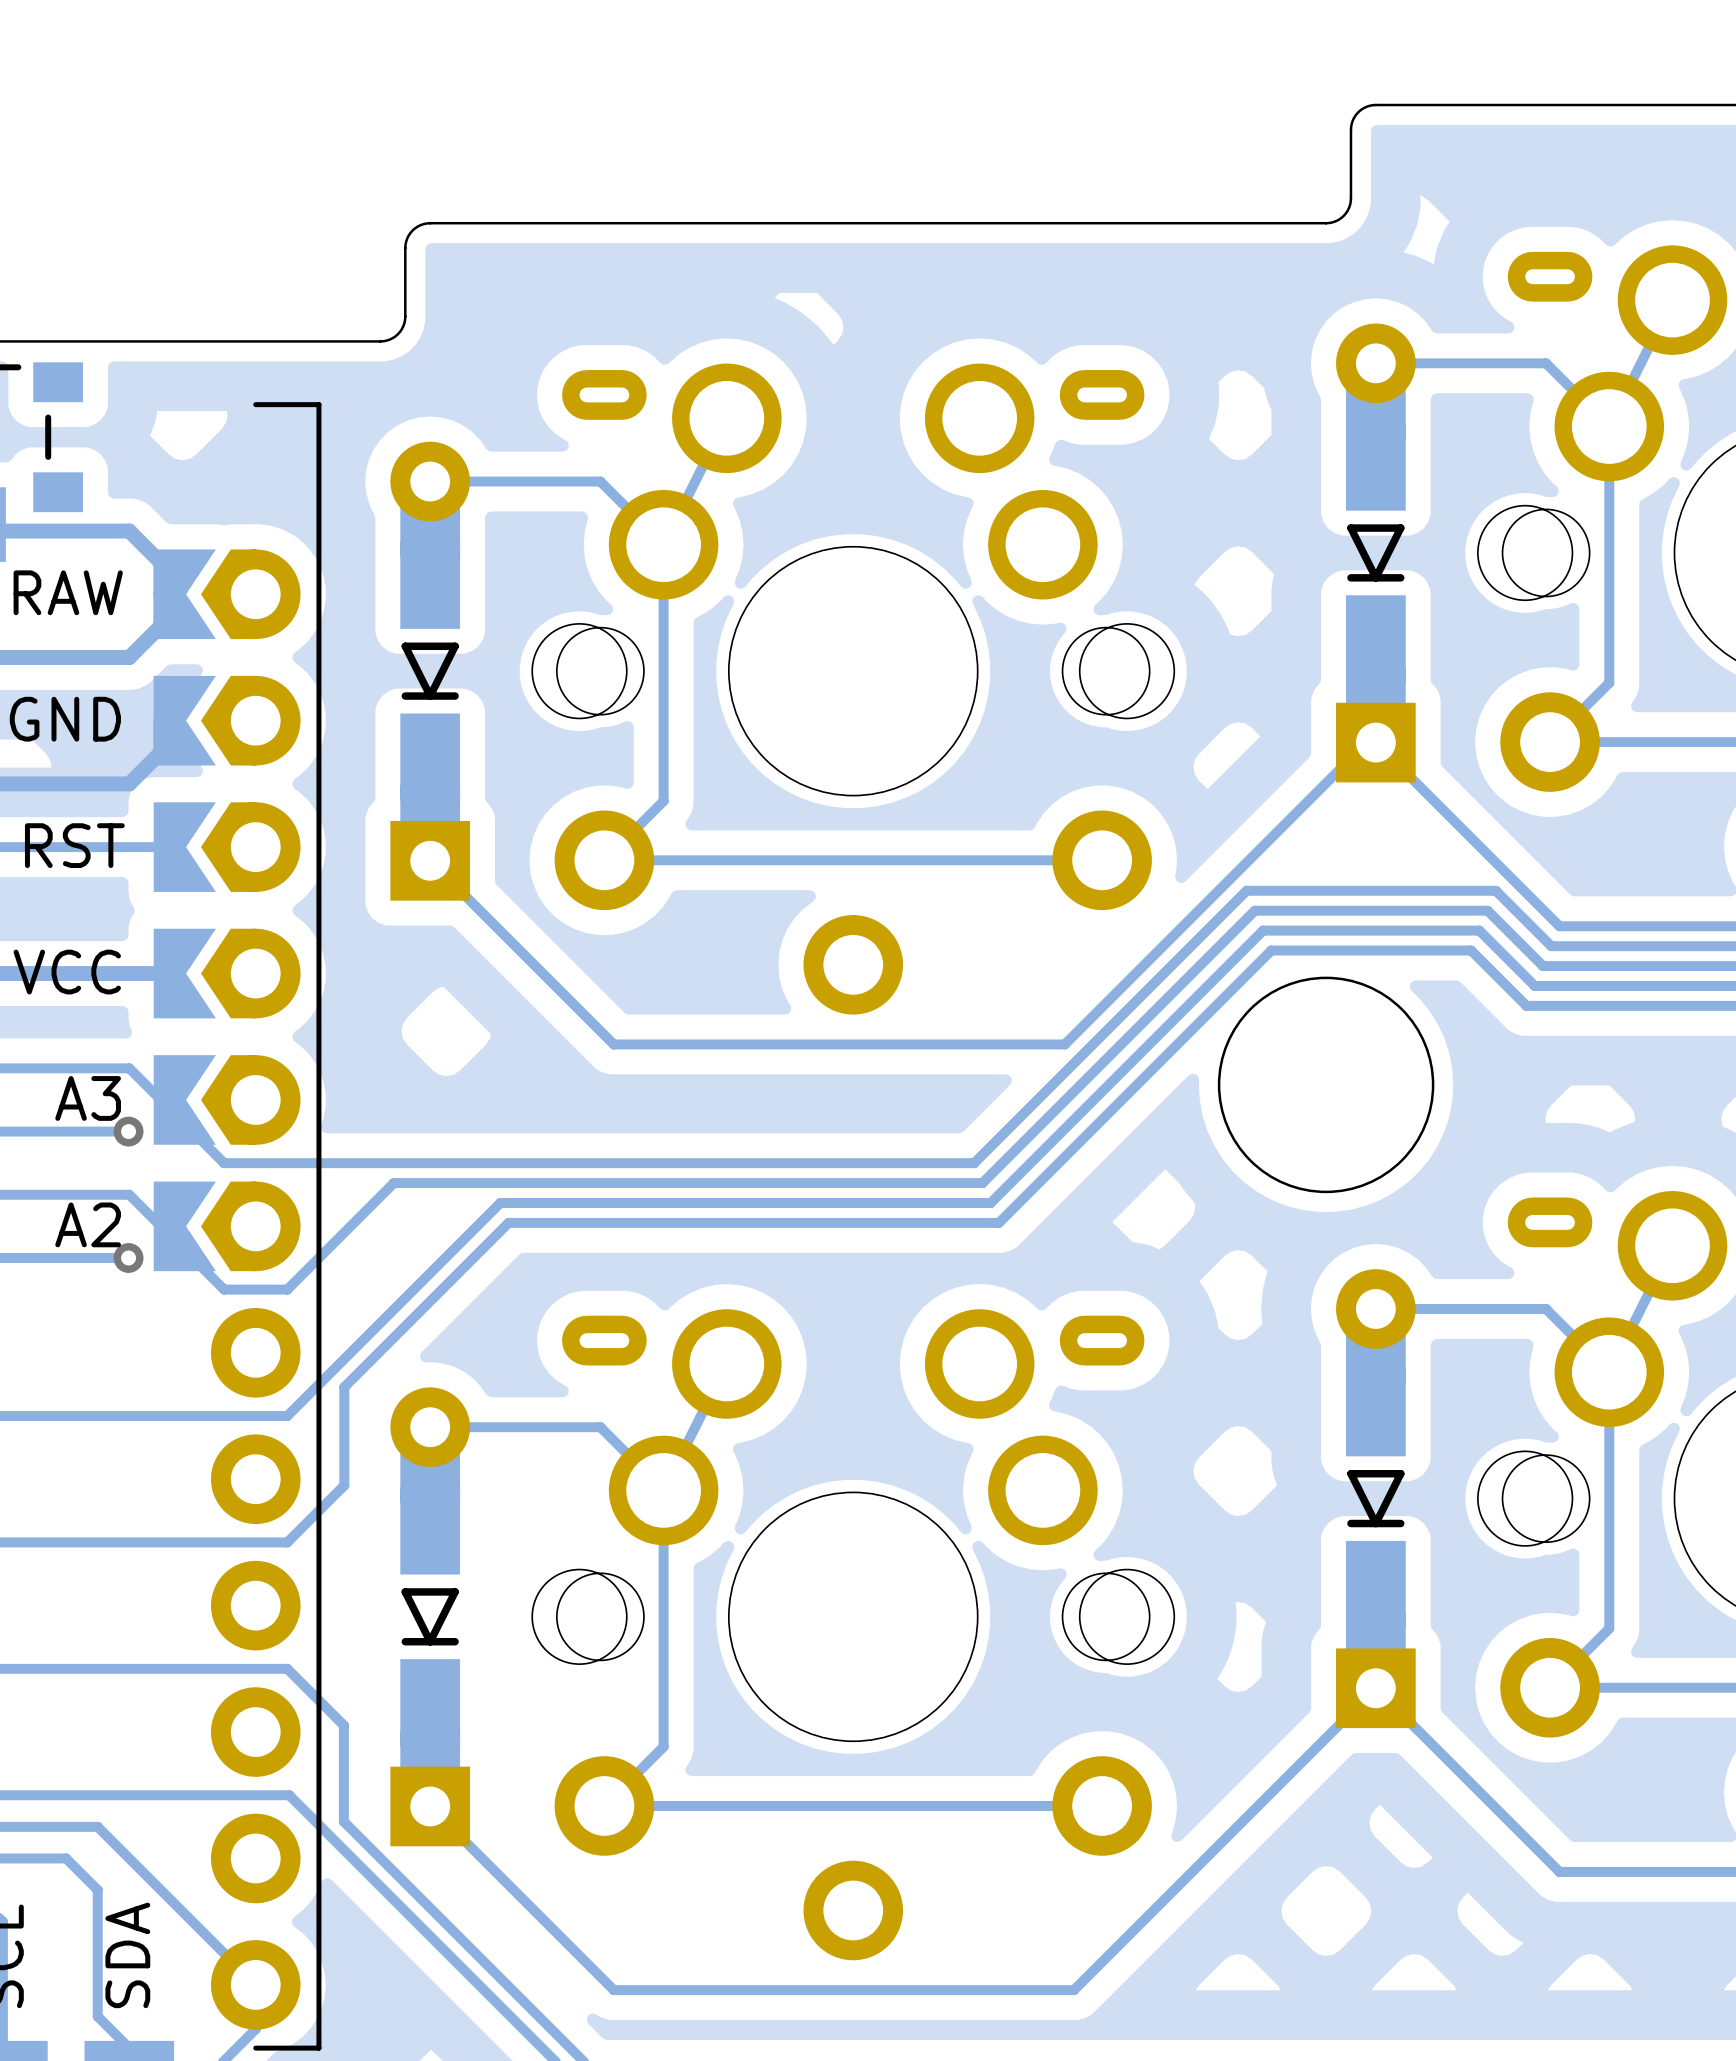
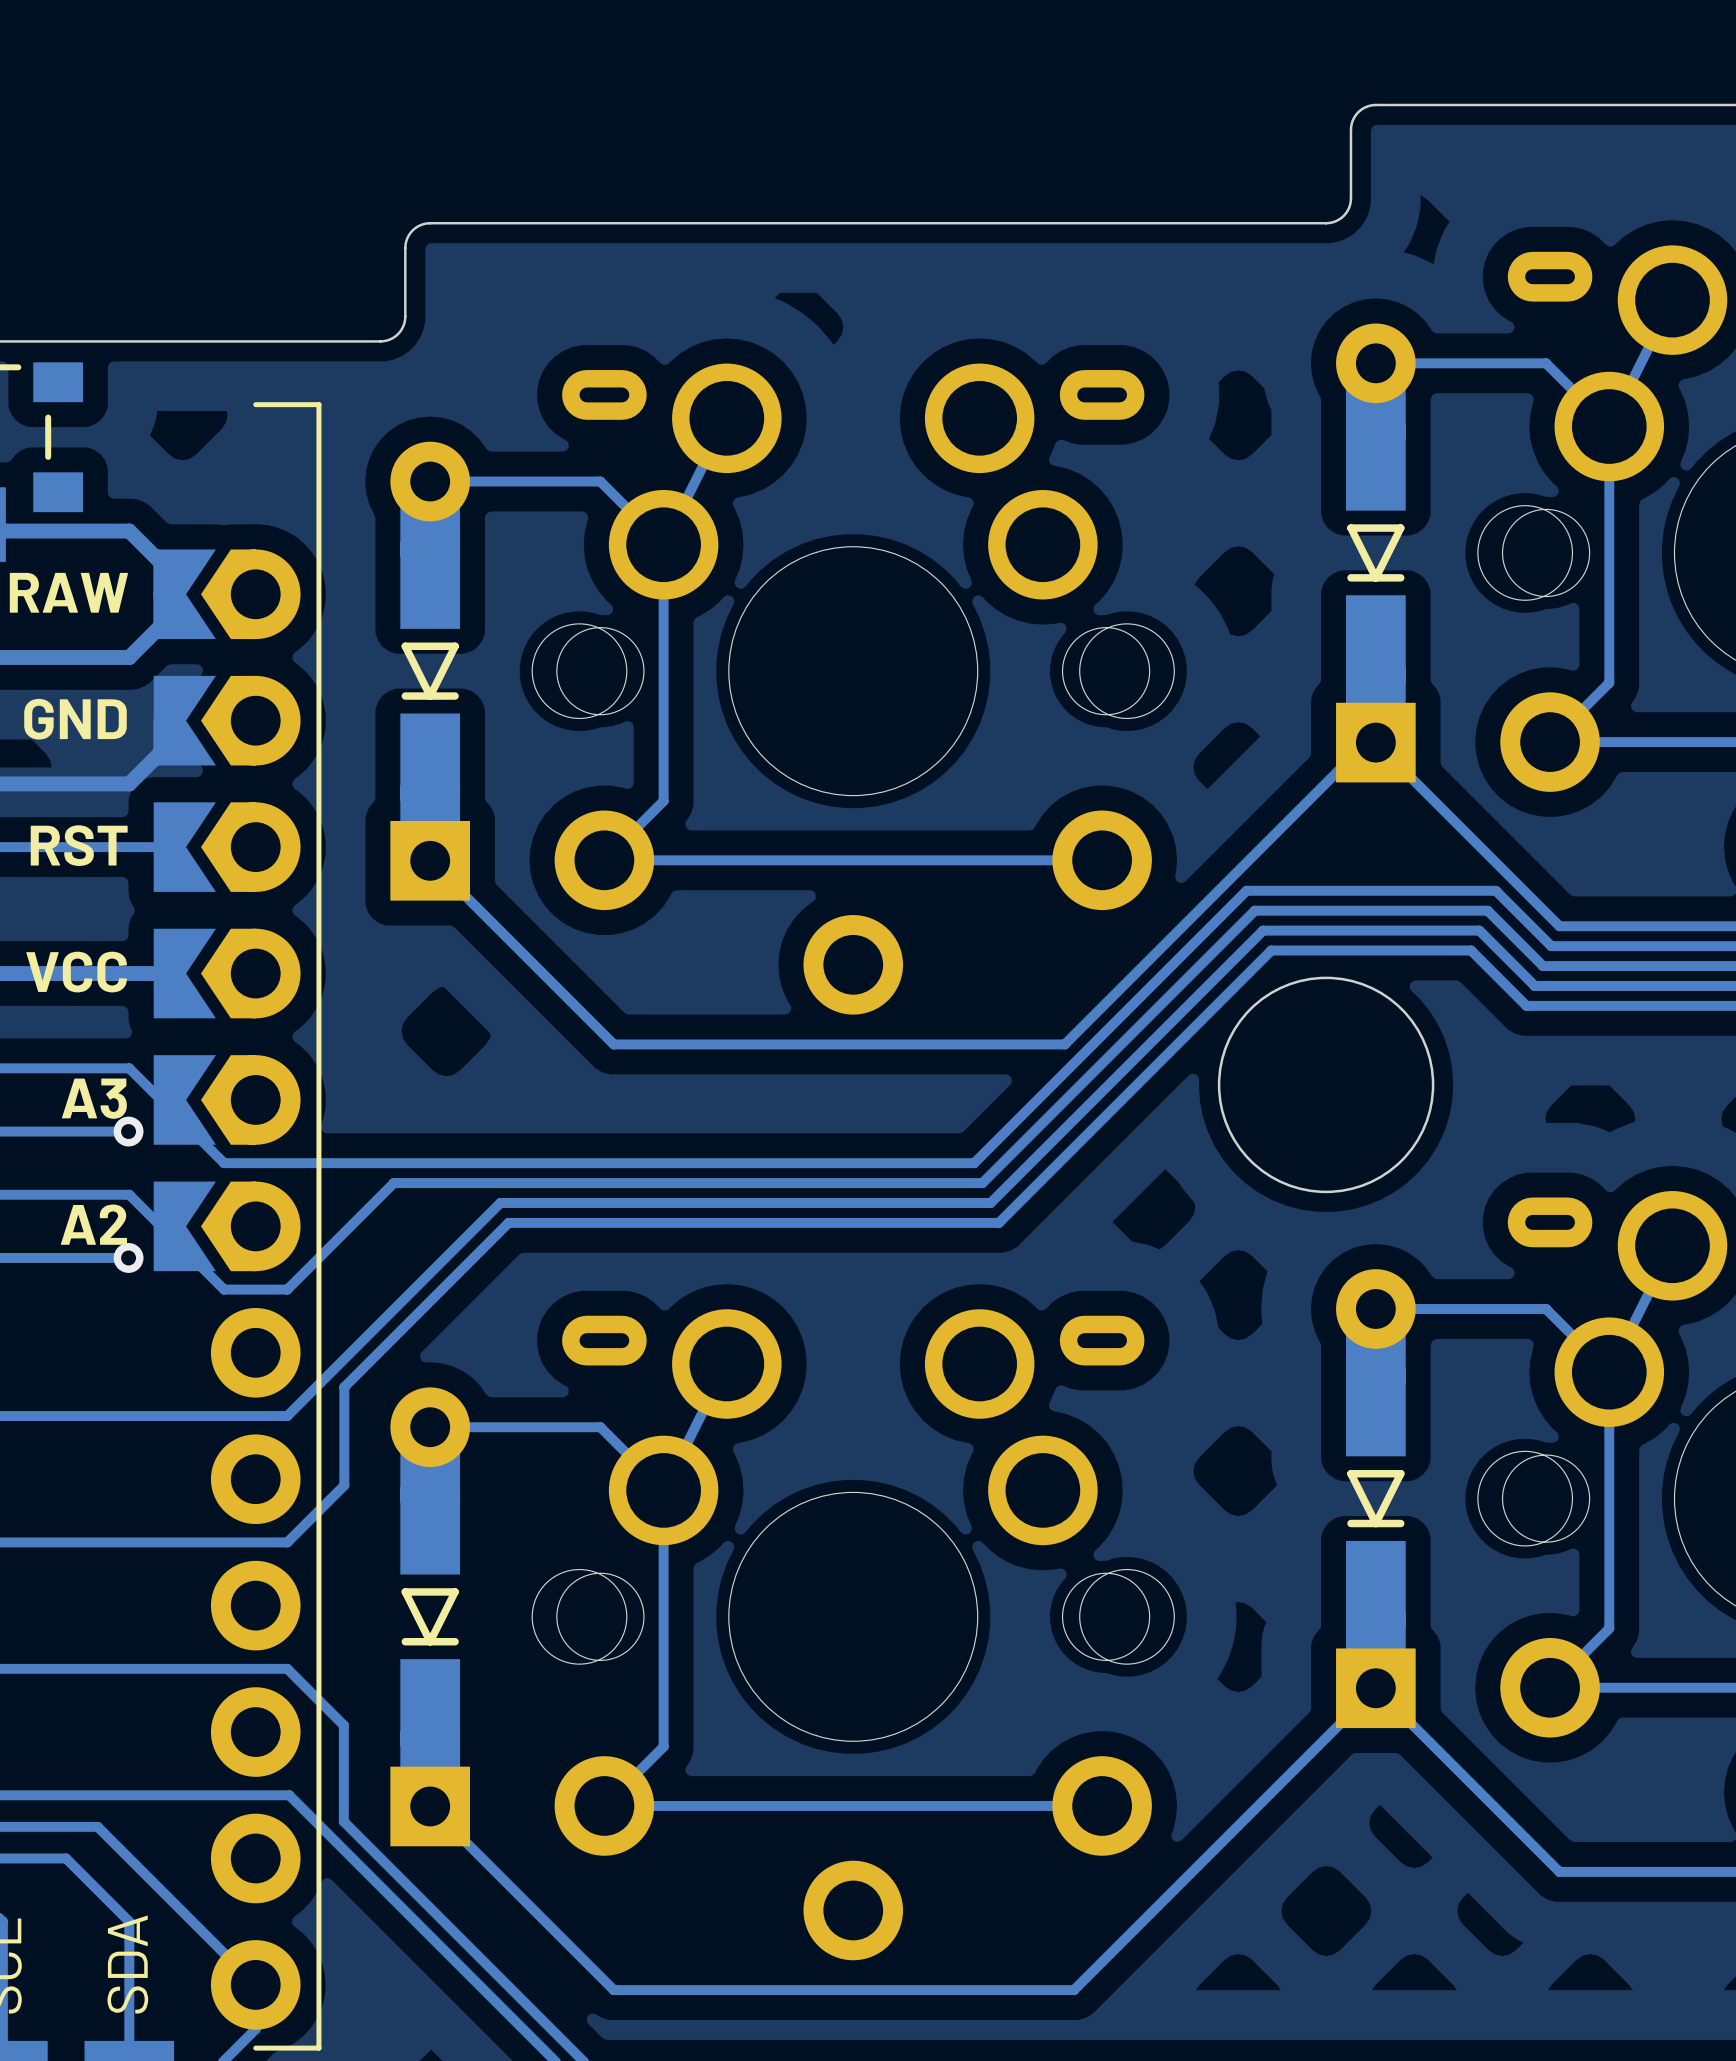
track: (97, 1890) (97, 2016) (129, 2048) -> (97, 1890) (129, 1921) (129, 2048)

